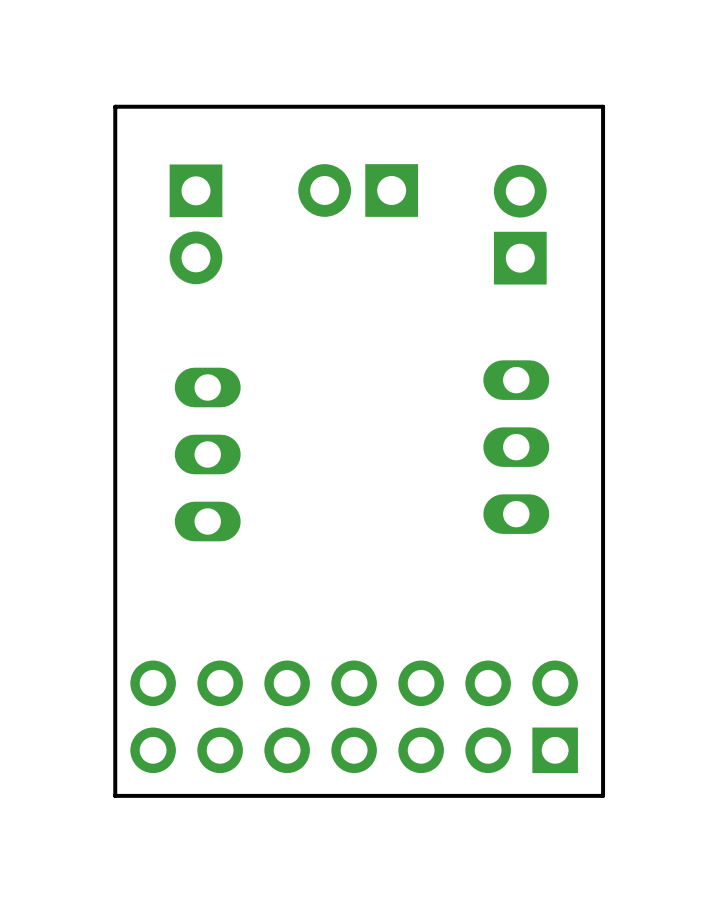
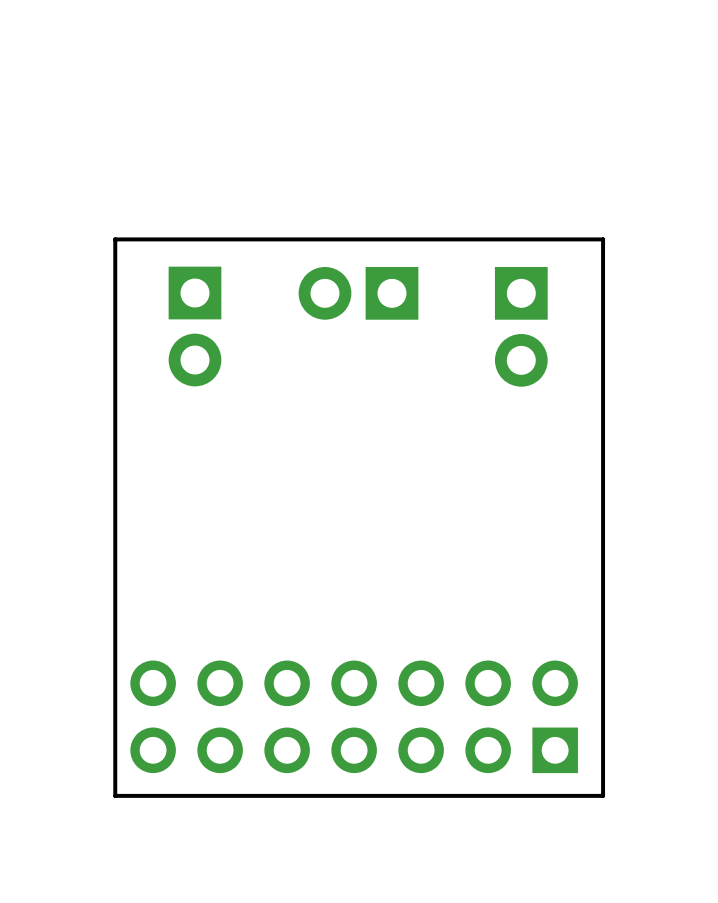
part: (358, 190) -> none
part: (196, 224) -> none
part: (520, 224) -> none
board edge: (603, 239) (603, 106) (115, 106) (115, 239) -> (603, 239) (115, 239)
part: none -> (358, 293)
part: none -> (195, 326)
part: none -> (521, 326)
part: (516, 447) -> none
part: (207, 454) -> none

